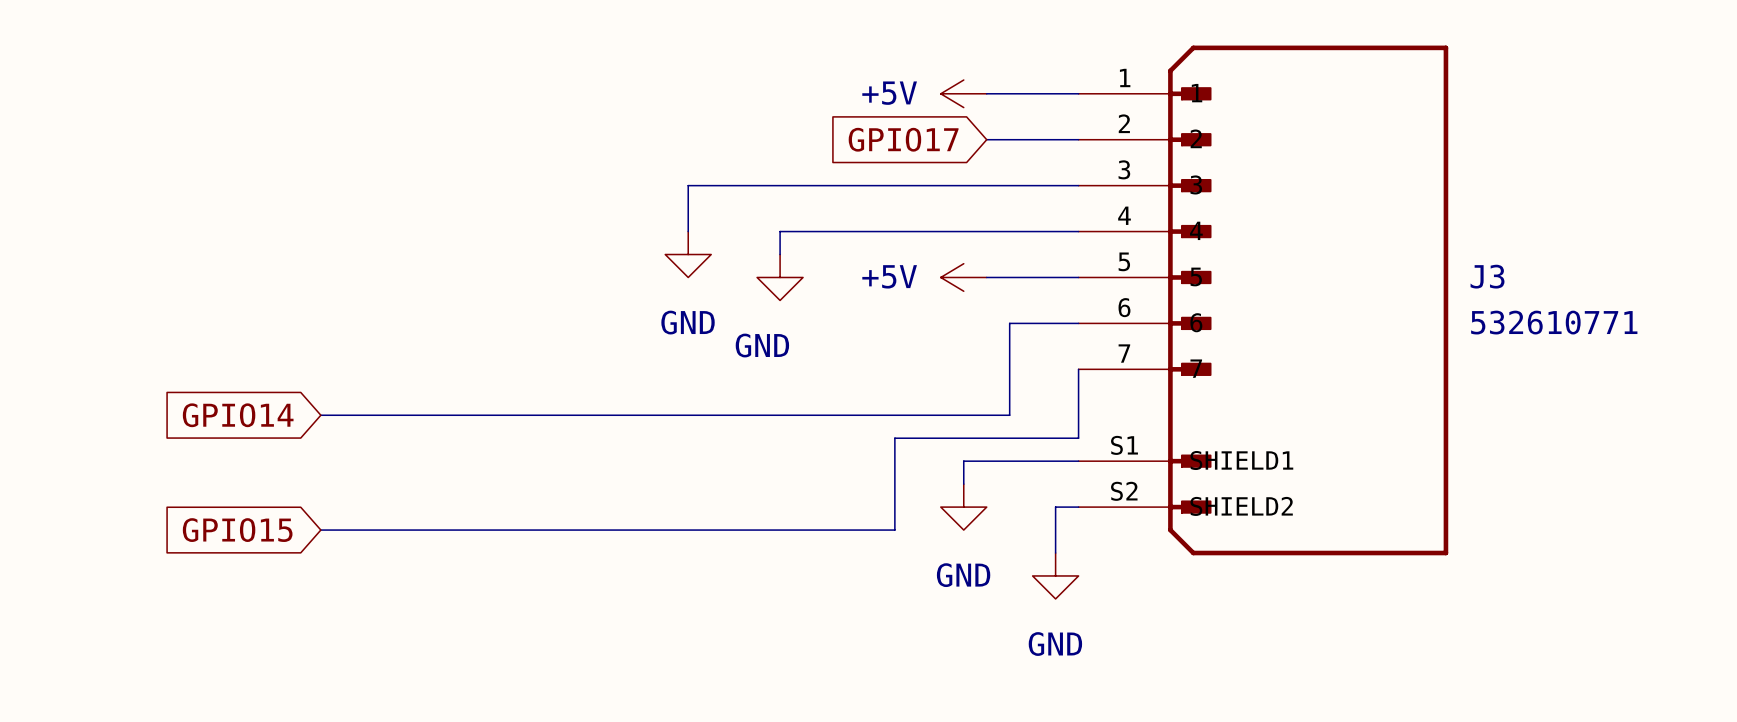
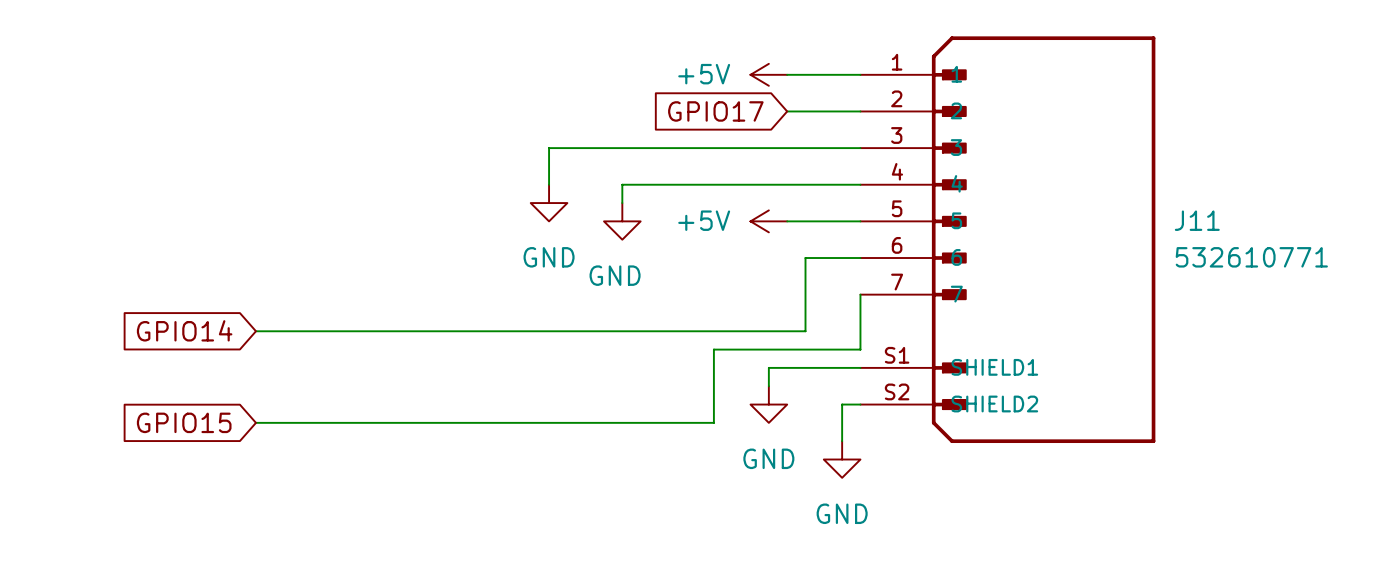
J3 name: J3 (1487, 276) -> J11 (1197, 220)

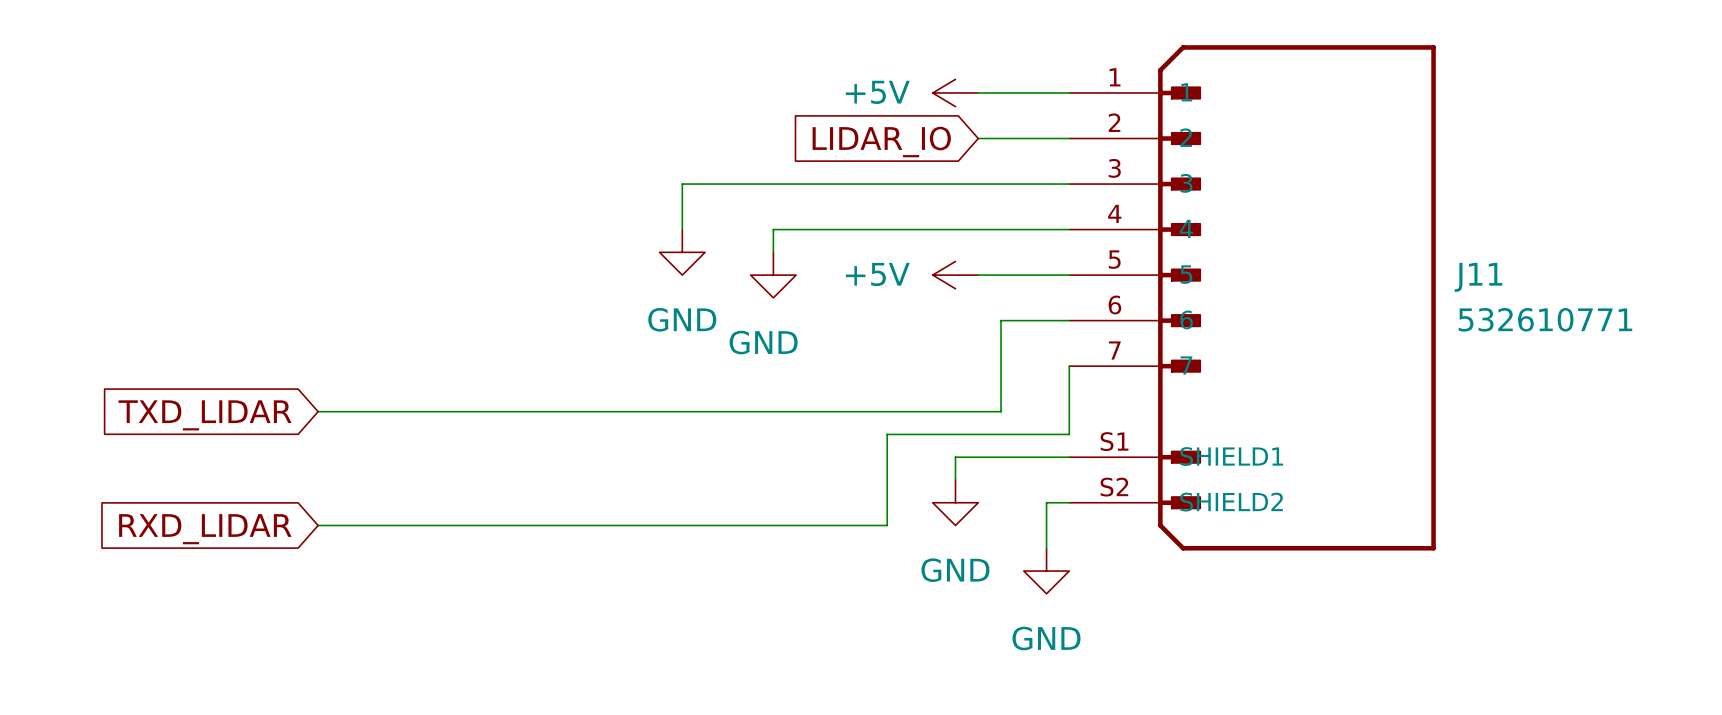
global label: GPIO17 (715, 111) -> LIDAR_IO (881, 141)
global label: GPIO14 (184, 330) -> TXD_LIDAR (205, 415)
global label: GPIO15 (184, 422) -> RXD_LIDAR (205, 529)

